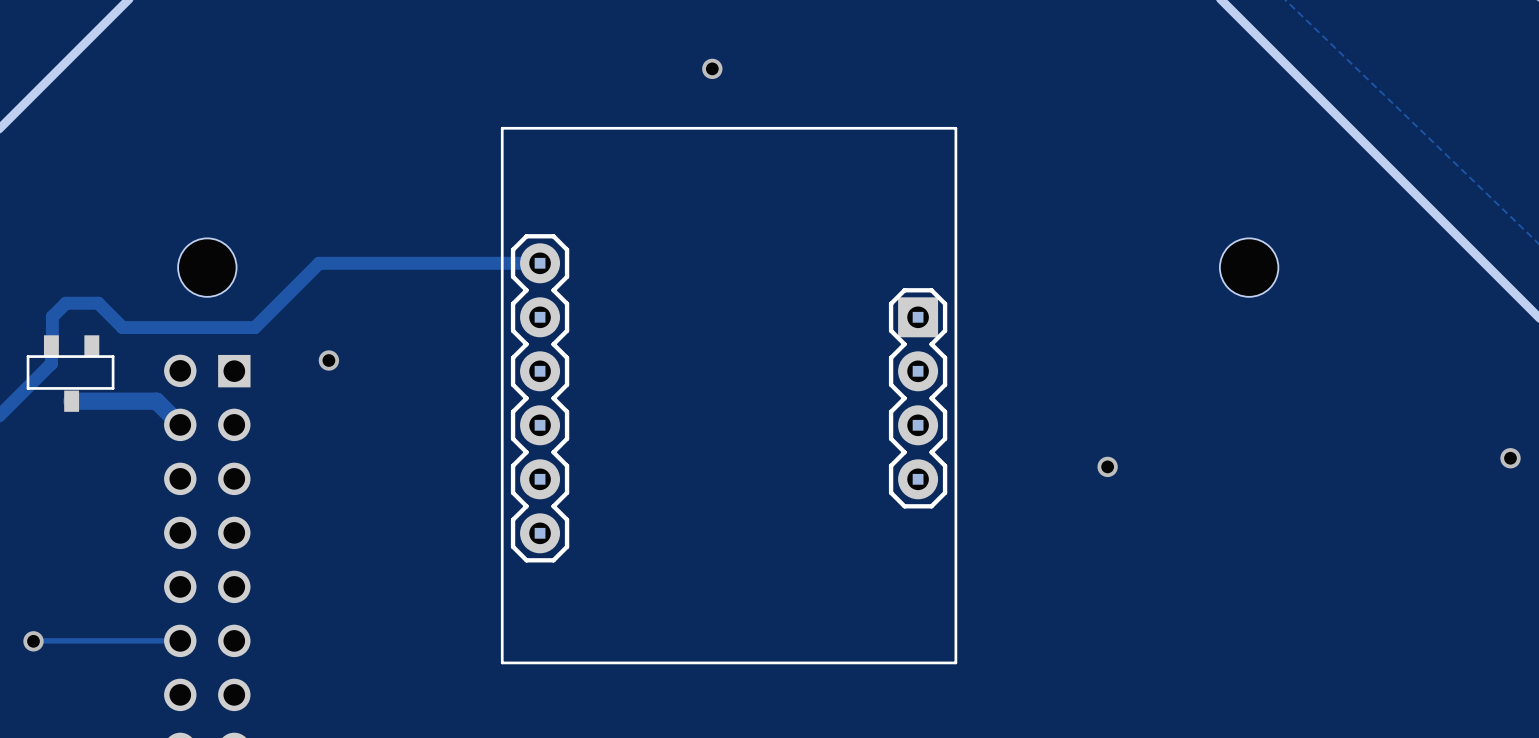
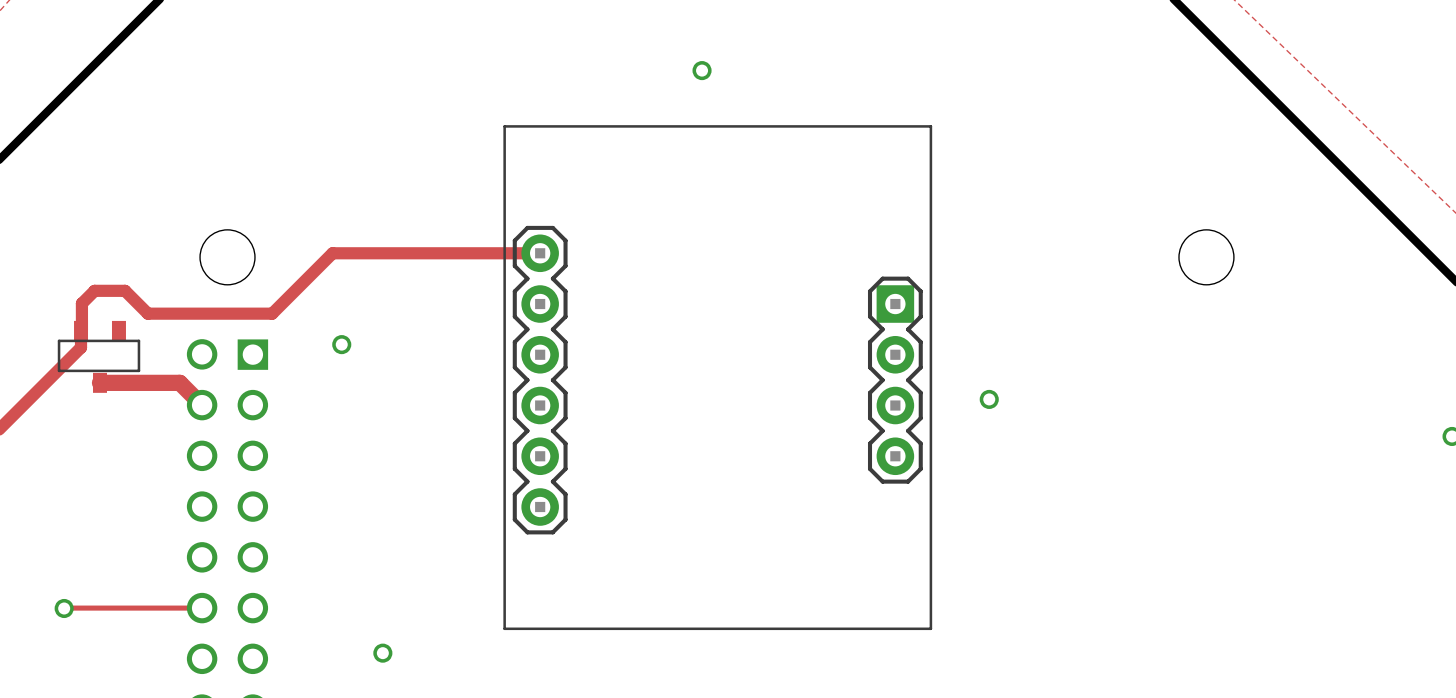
via position: (1107, 466) -> (989, 399)
via: none -> (382, 653)

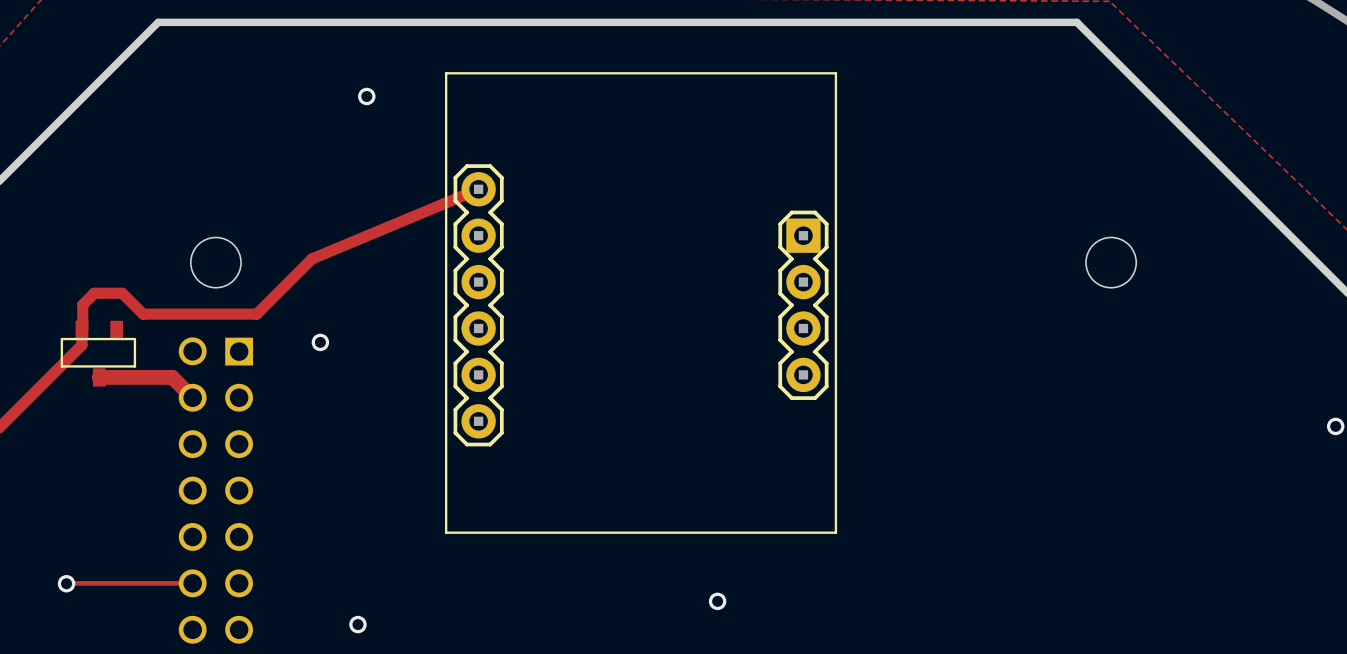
via: (702, 70) -> none
via: none -> (366, 96)
track: (332, 253) (540, 253) -> (312, 258) (478, 189)
part position: (717, 377) -> (641, 302)
via: (989, 399) -> none
via: none -> (717, 601)

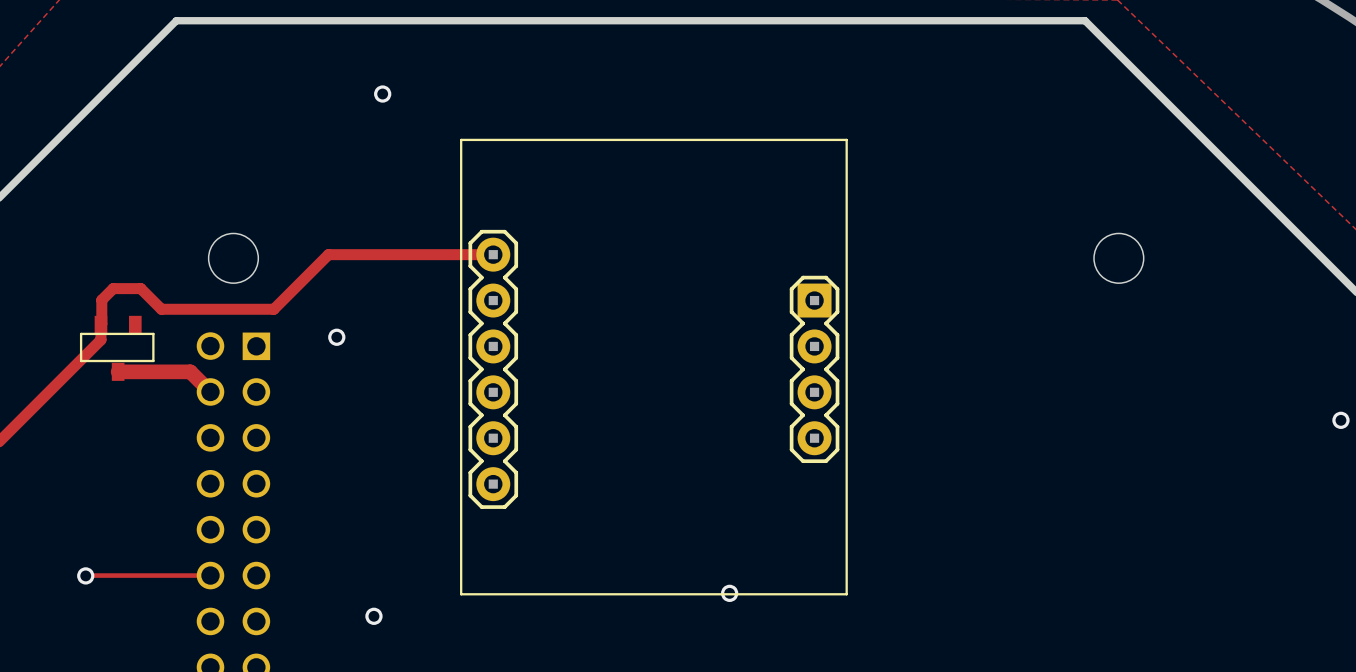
track: (478, 189) (312, 258) -> (493, 254) (328, 254)
part position: (641, 302) -> (653, 367)

